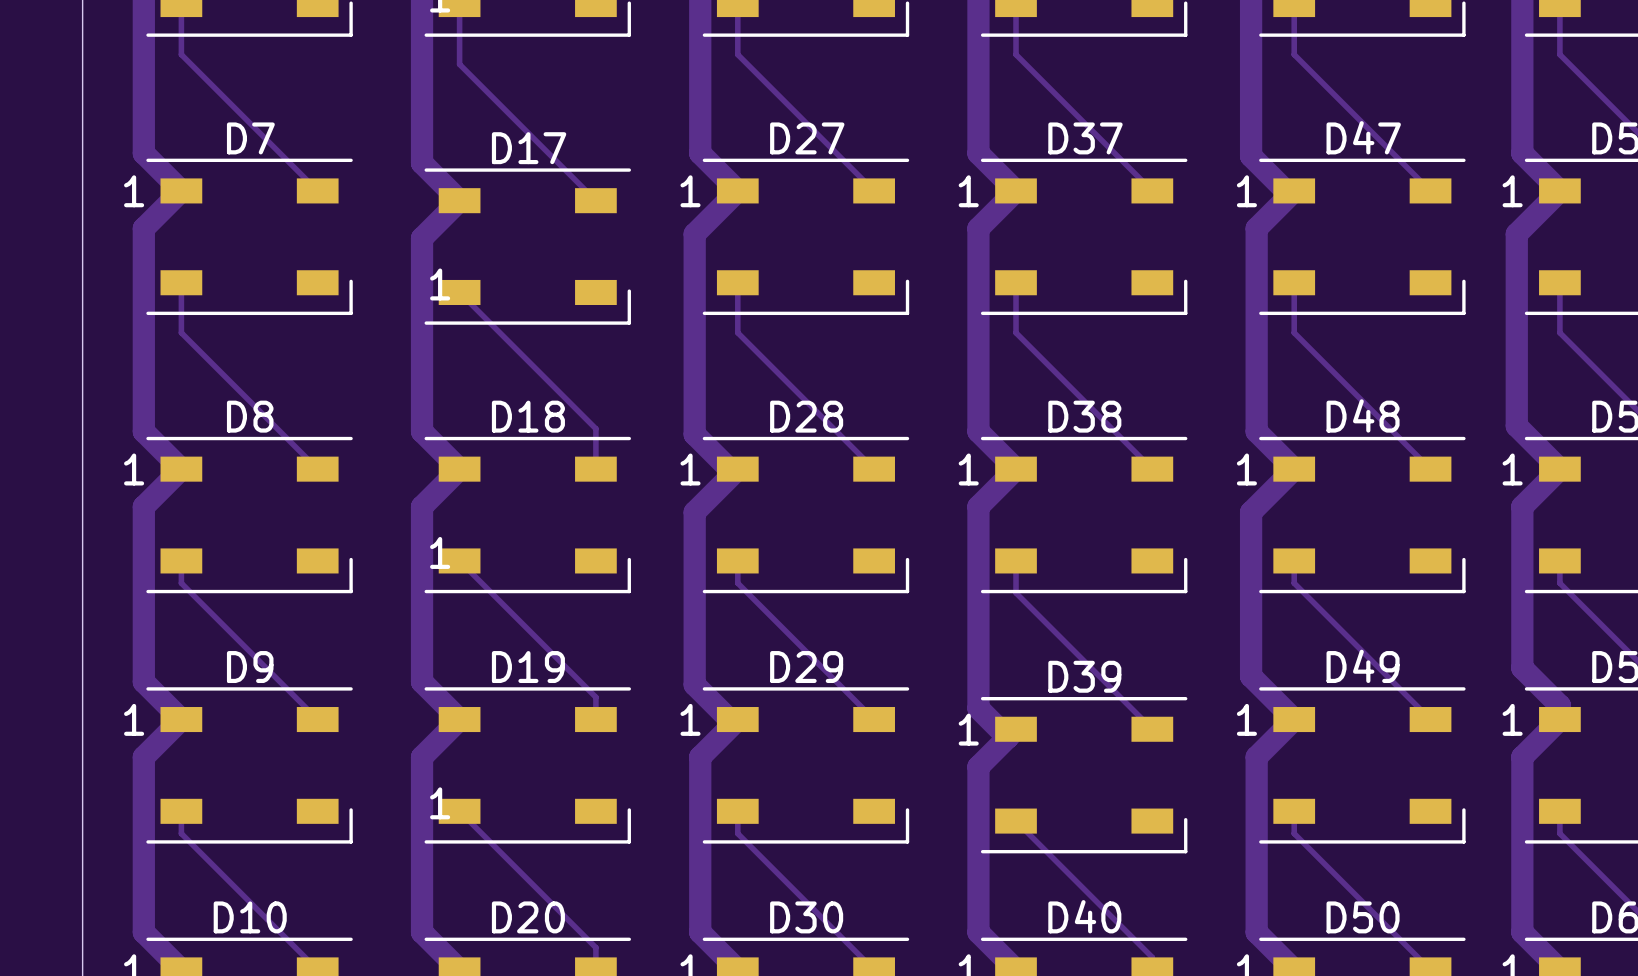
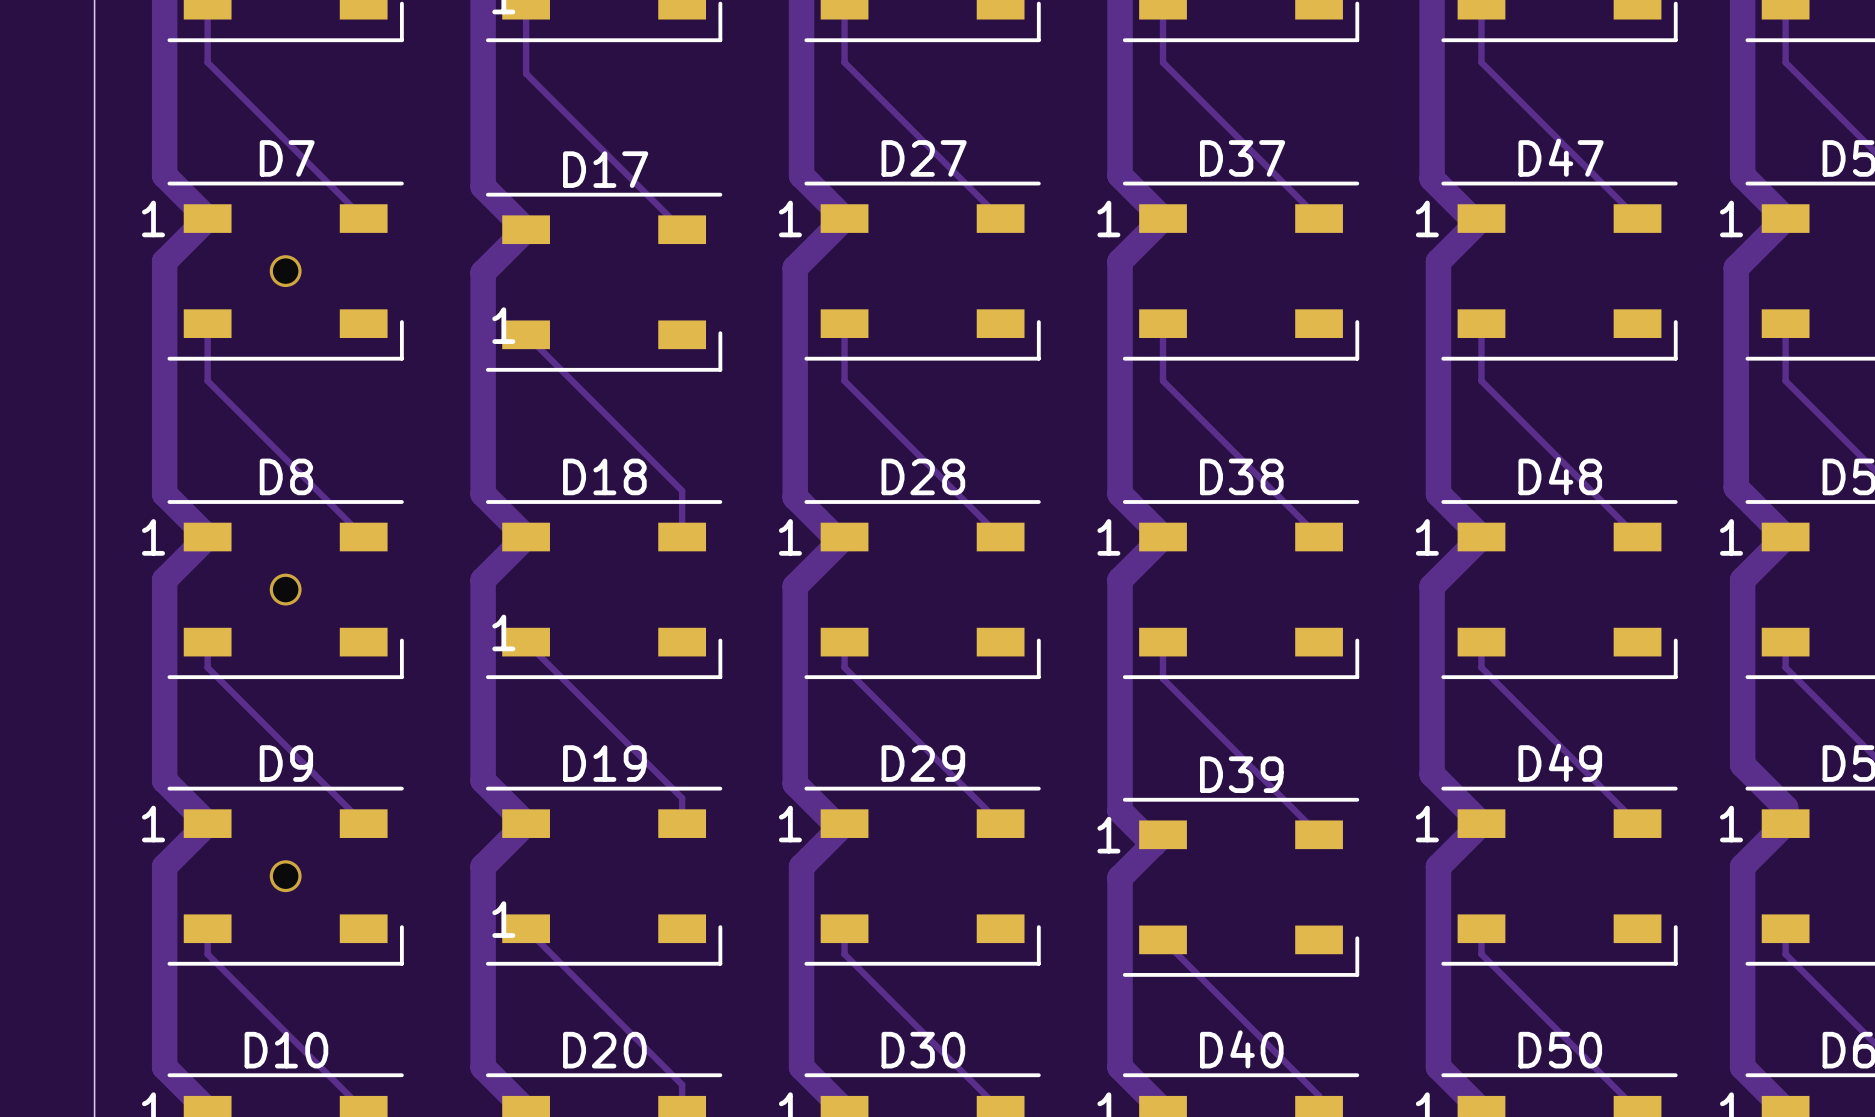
via: none -> (285, 271)
via: none -> (285, 589)
via: none -> (285, 876)

